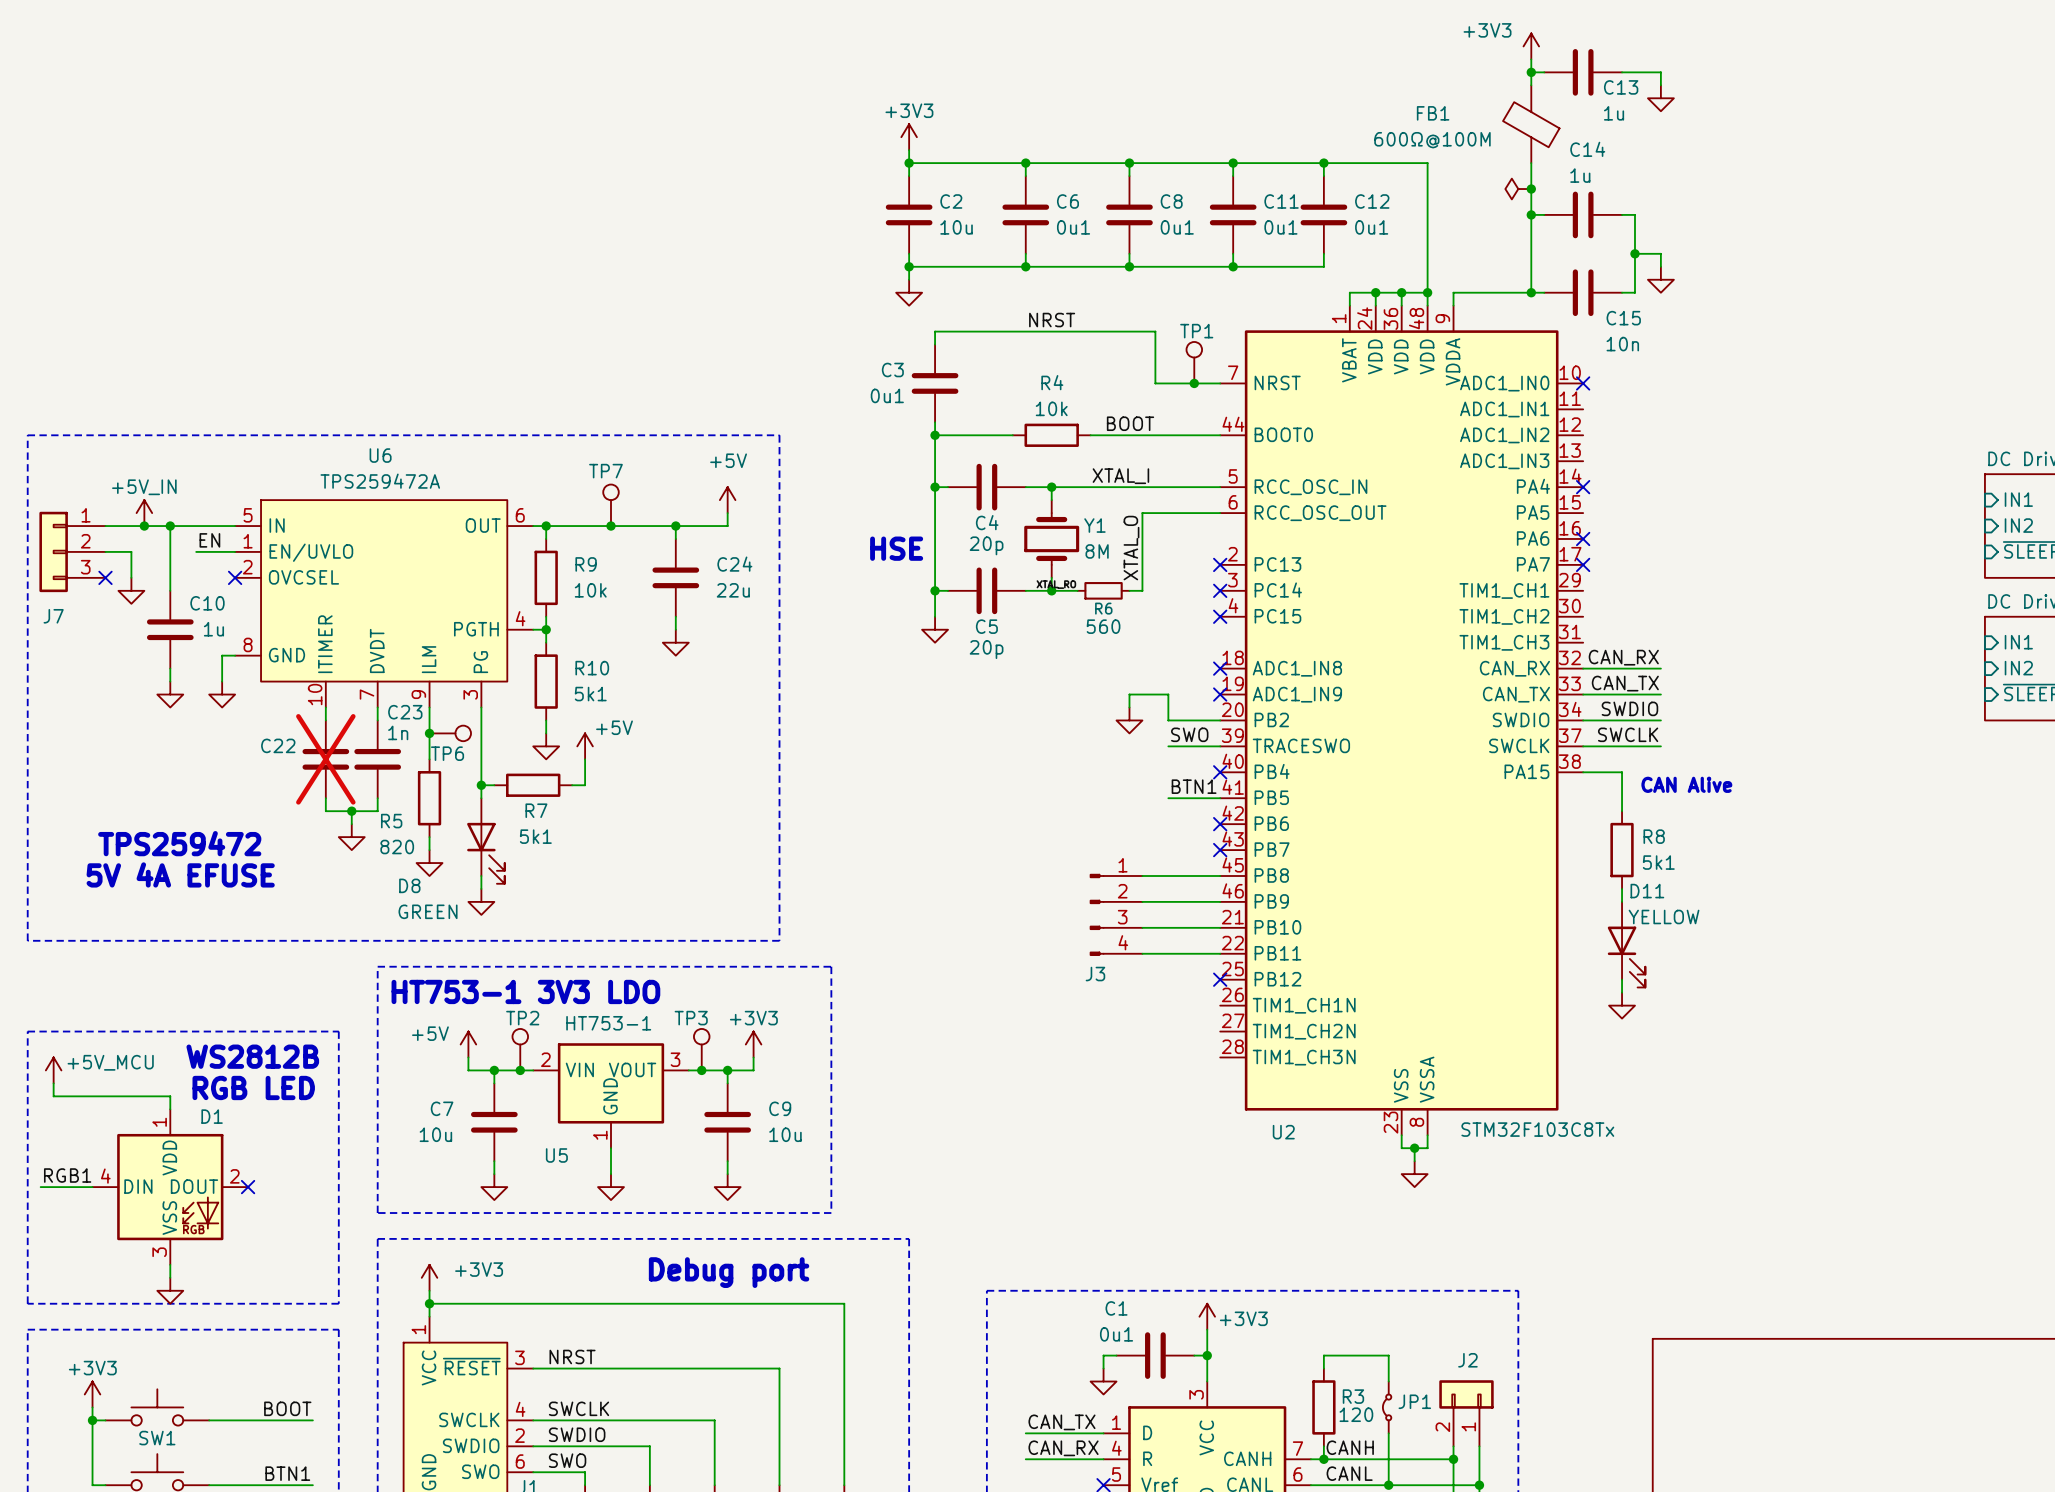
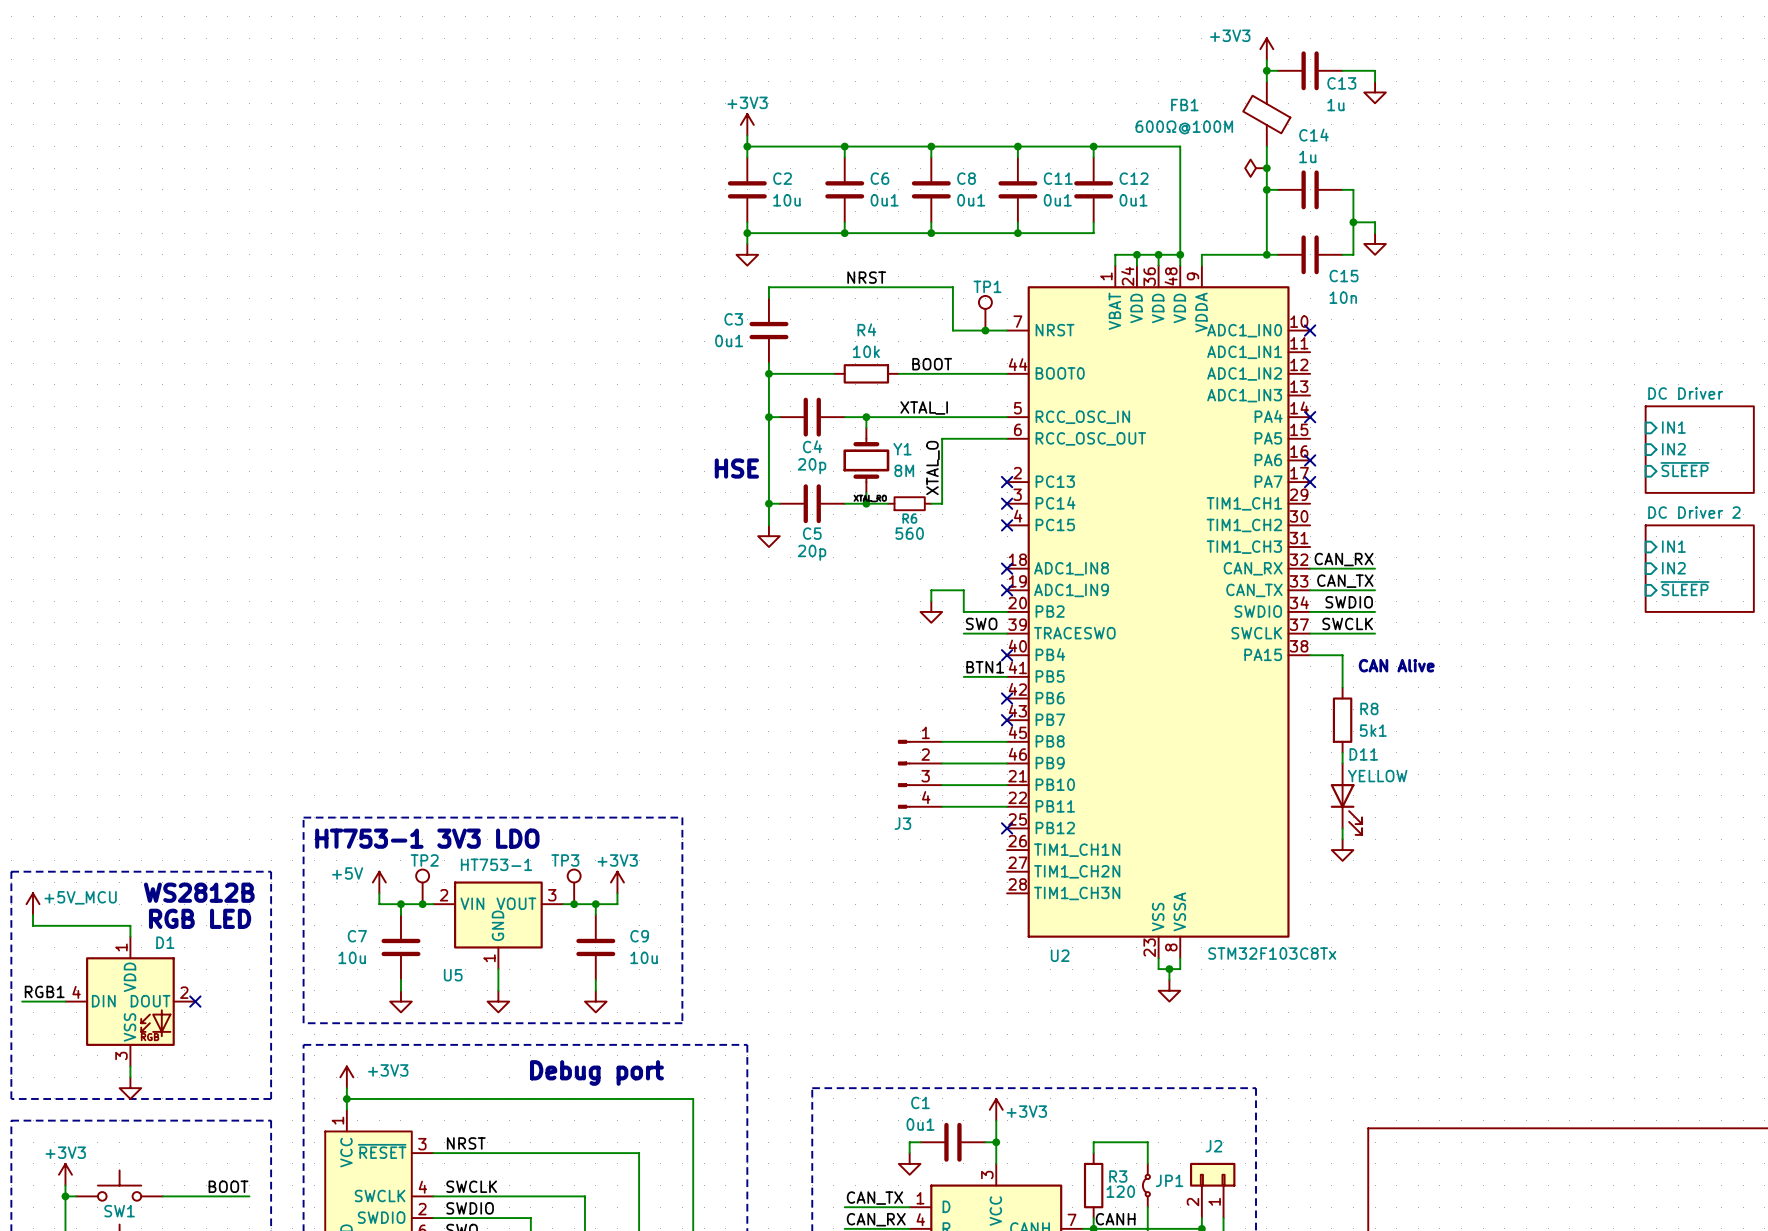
line: (27, 435) (779, 435) (779, 940) (27, 940) (27, 435) -> none
power symbol: +5V (727, 500) -> none
TP7: (611, 505) -> none
power symbol: +5V_IN (144, 513) -> none
wire: (727, 513) (727, 526) (533, 526) -> none
wire: (105, 526) (235, 526) -> none
junction: (144, 526) -> none
wire: (170, 526) (170, 590) -> none
junction: (170, 526) -> none
wire: (546, 526) (546, 538) -> none
junction: (546, 526) -> none
junction: (611, 526) -> none
wire: (675, 526) (675, 538) -> none
junction: (675, 526) -> none
label: EN (209, 540) -> none
J7: (72, 551) -> none
wire: (105, 551) (131, 551) (131, 577) -> none
wire: (196, 551) (235, 551) -> none
no-connect mark: (105, 577) -> none
no-connect mark: (235, 577) -> none
R9: 10k (546, 577) -> none
C24: 22u (675, 577) -> none
power symbol: (131, 590) -> none
U6: TPS259472A (384, 603) -> none
wire: (546, 616) (546, 642) -> none
wire: (675, 616) (675, 629) -> none
C10: 1u (170, 629) -> none
wire: (533, 629) (546, 629) -> none
junction: (546, 629) -> none
power symbol: (675, 642) -> none
wire: (235, 655) (222, 655) (222, 681) -> none
wire: (170, 668) (170, 681) -> none
R10: 5k1 (546, 681) -> none
power symbol: (170, 694) -> none
power symbol: (222, 694) -> none
wire: (325, 707) (325, 720) -> none
wire: (377, 707) (377, 720) -> none
wire: (429, 707) (429, 759) -> none
wire: (481, 707) (481, 798) -> none
wire: (546, 720) (546, 733) -> none
junction: (429, 733) -> none
TP6: (450, 733) -> none
power symbol: (546, 746) -> none
power symbol: +5V (585, 746) -> none
C22: (325, 759) -> none
C23: 1n (377, 759) -> none
wire: (585, 759) (585, 785) (572, 785) -> none
wire: (481, 785) (494, 785) -> none
junction: (481, 785) -> none
R7: 5k1 (533, 785) -> none
wire: (325, 798) (325, 811) (377, 811) (377, 798) -> none
R5: 820 (429, 798) -> none
wire: (351, 811) (351, 824) -> none
junction: (351, 811) -> none
power symbol: (351, 837) -> none
wire: (429, 837) (429, 850) -> none
D8: GREEN (485, 841) -> none
text: TPS259472 (179, 843) -> none
power symbol: (429, 863) -> none
text: 5V 4A EFUSE (180, 874) -> none
wire: (481, 876) (481, 888) -> none
power symbol: (481, 901) -> none

